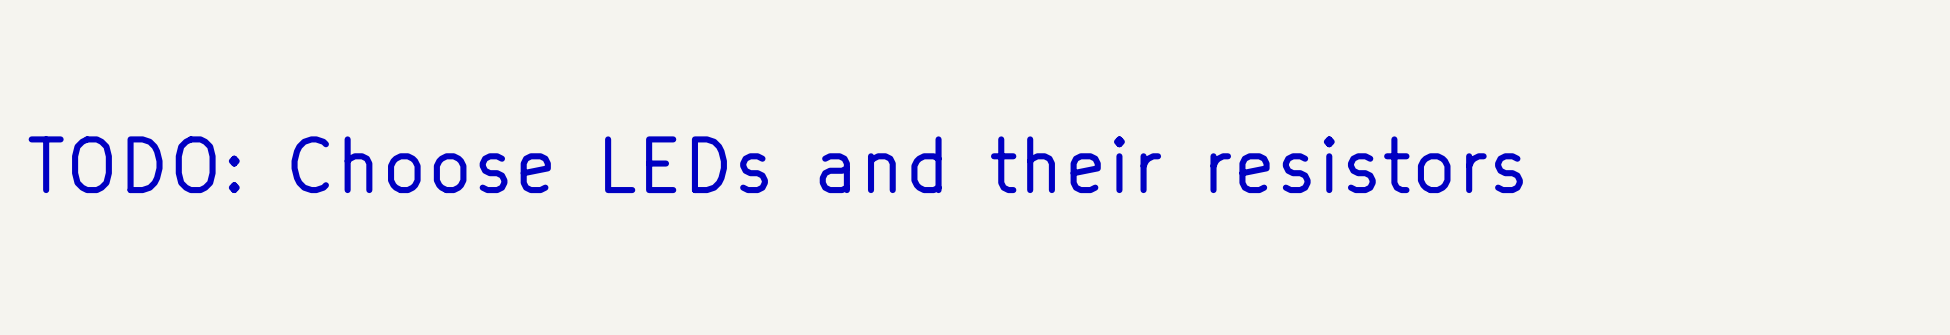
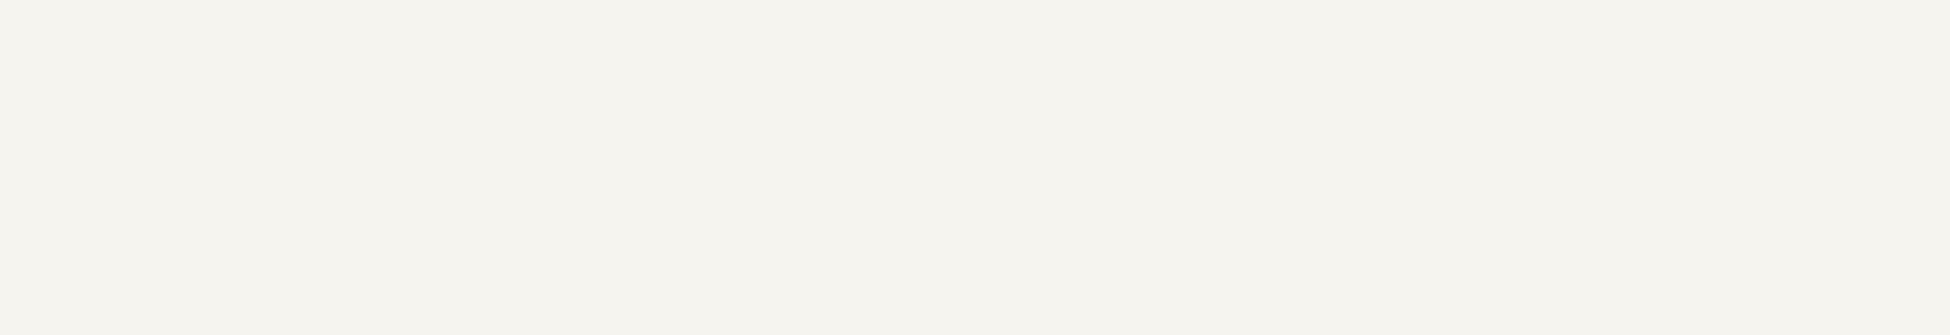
text: TODO: Choose LEDs and their resistors (775, 164) -> none

